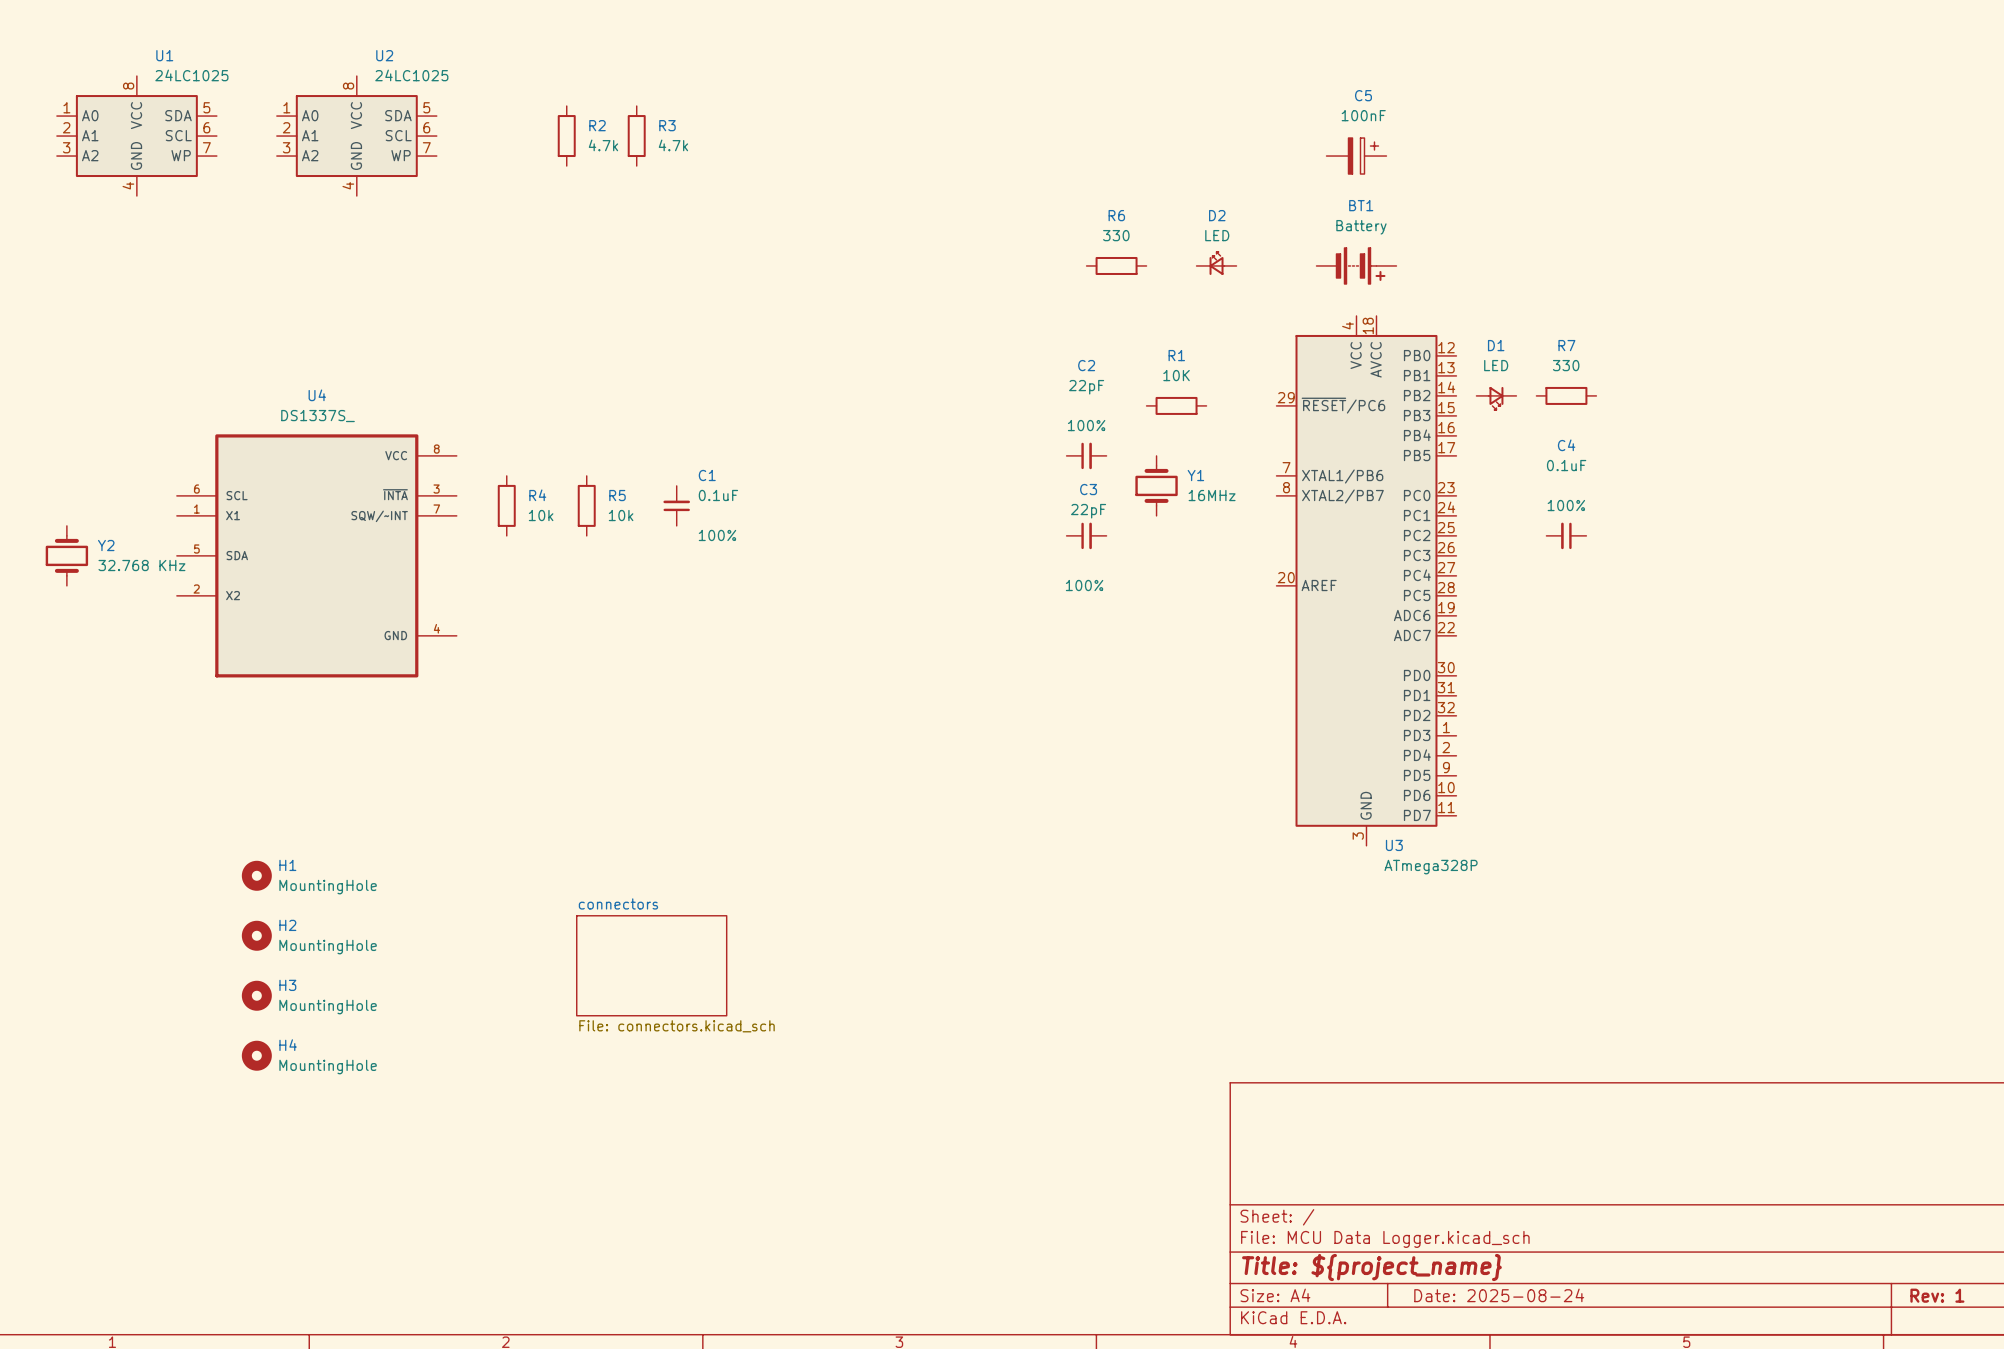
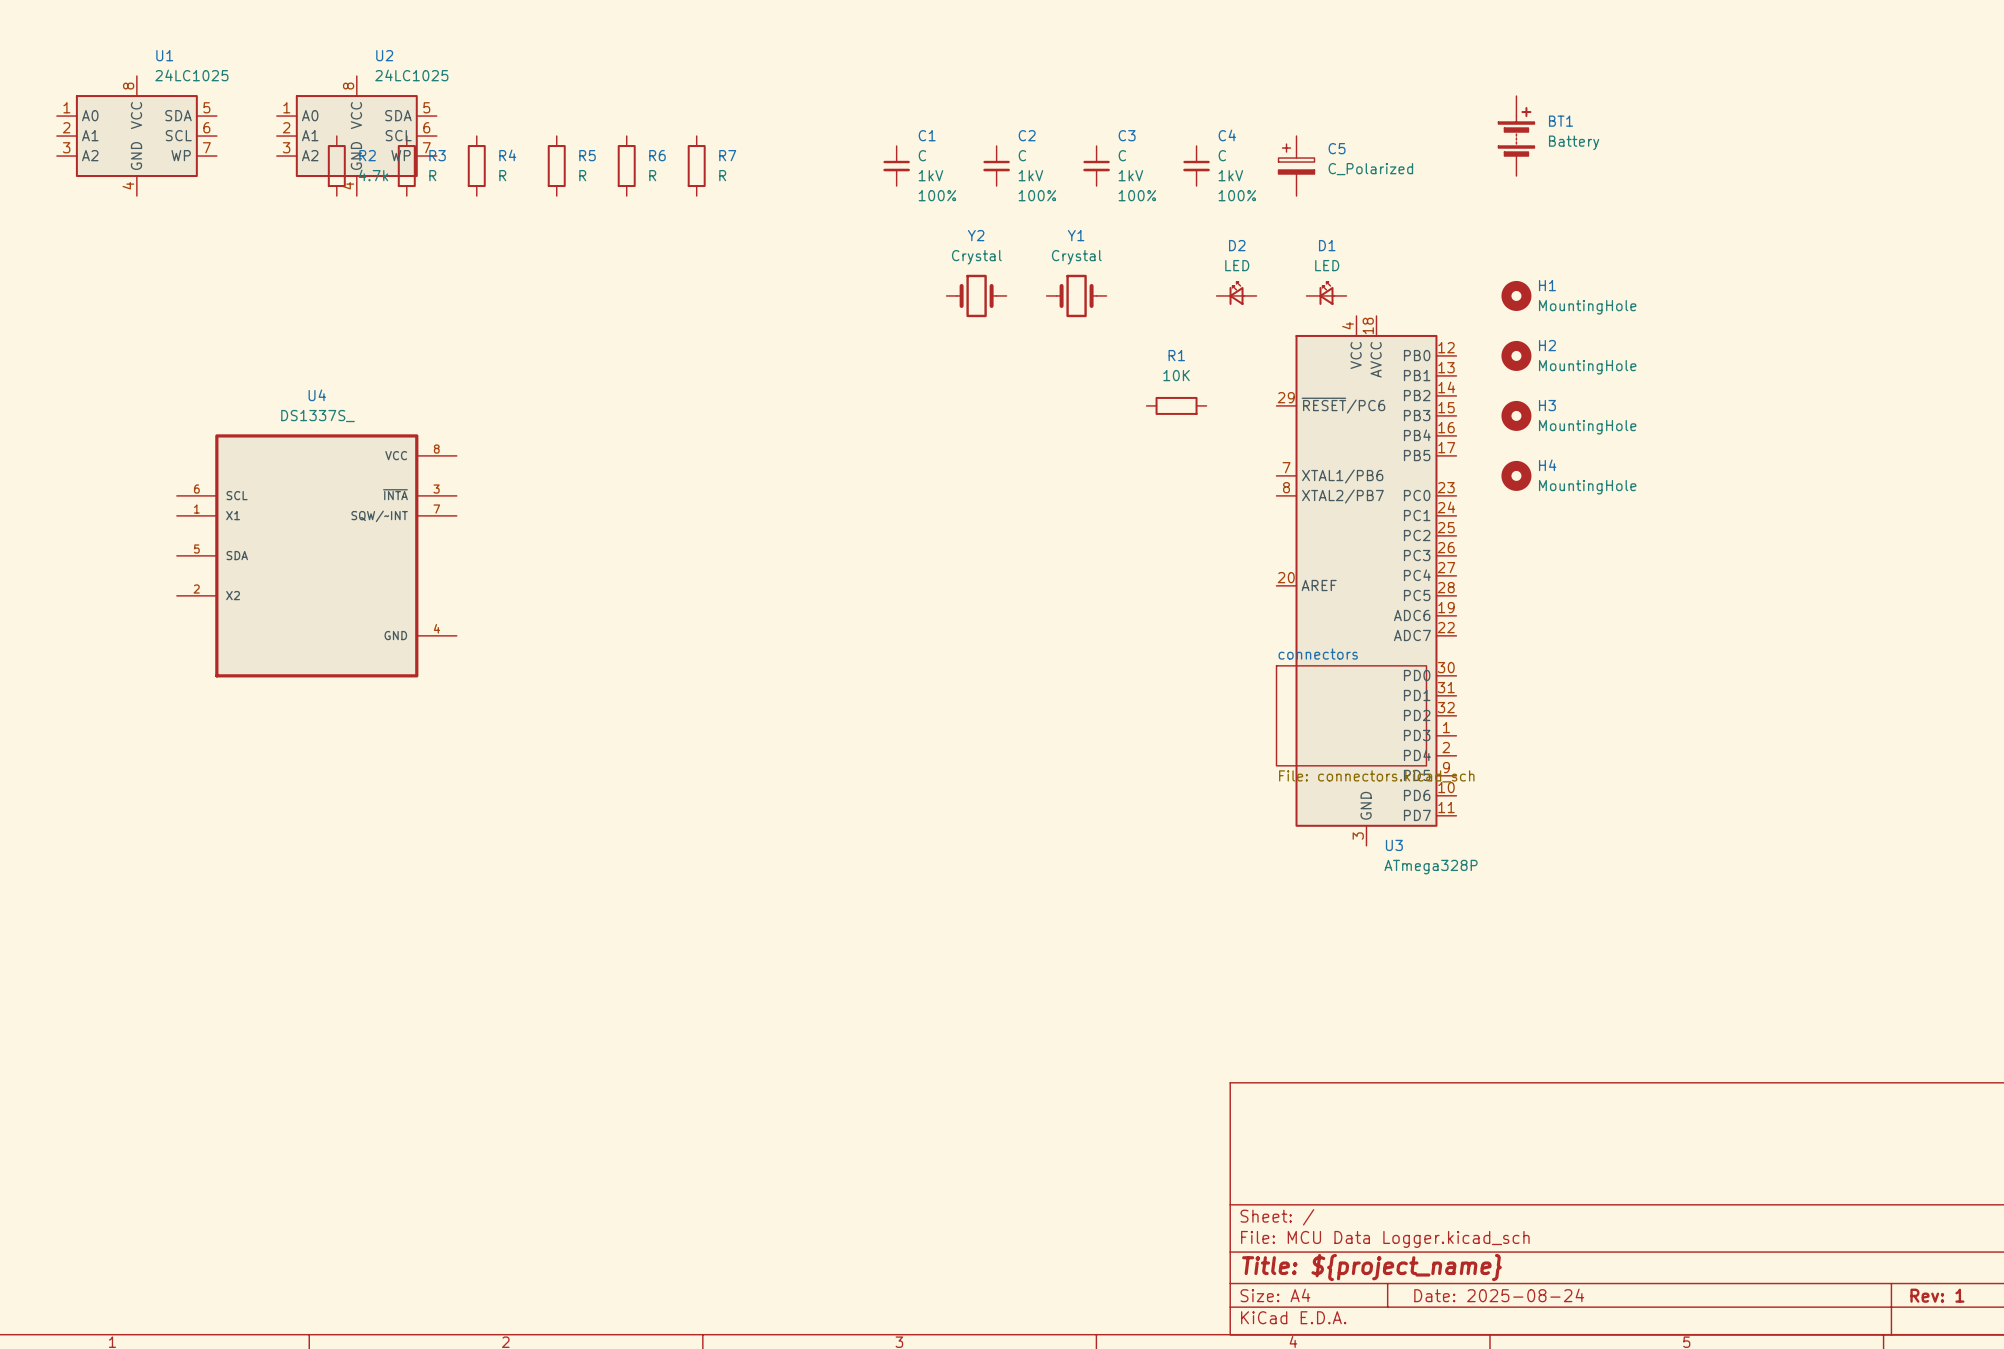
C5 name position: C5 (1363, 95) -> C5 (1337, 148)
C5 value: 100nF (1363, 115) -> C_Polarized (1370, 169)
R2 position: (566, 136) -> (336, 166)
R3 position: (636, 136) -> (406, 166)
R3 value: 4.7k (673, 145) -> R (432, 175)
C5 position: (1356, 156) -> (1296, 166)
C5 rotation: 0° (1363, 156) -> 90° counterclockwise (1296, 159)
C1 text: none -> 1kV (930, 175)
C2 text: none -> 1kV (1030, 175)
C3 text: none -> 1kV (1130, 175)
C4 text: none -> 1kV (1230, 175)
BT1 name position: BT1 (1361, 205) -> BT1 (1561, 121)
R6 name position: R6 (1116, 215) -> R6 (657, 155)
BT1 value position: Battery (1361, 227) -> Battery (1574, 142)
R6 value: 330 (1116, 235) -> R (652, 175)
D2 position: (1216, 263) -> (1236, 293)
R6 rotation: 0° (1116, 265) -> 90° clockwise (626, 166)
R6 position: (1116, 265) -> (626, 166)
BT1 position: (1356, 265) -> (1516, 136)
BT1 rotation: 0° (1360, 265) -> 90° counterclockwise (1516, 131)
R7 name position: R7 (1566, 345) -> R7 (727, 155)
C2 name position: C2 (1086, 365) -> C2 (1027, 135)
R7 value: 330 (1566, 365) -> R (722, 175)
C2 value: 22pF (1086, 387) -> C (1022, 155)
R7 rotation: 0° (1566, 395) -> 90° clockwise (696, 166)
R7 position: (1566, 395) -> (696, 166)
D1 rotation: 0° (1495, 398) -> 180° (1326, 293)
D1 position: (1496, 398) -> (1326, 293)
C2 text position: 100% (1086, 425) -> 100% (1037, 195)
C4 name position: C4 (1566, 445) -> C4 (1227, 135)
C2 rotation: 0° (1086, 455) -> 90° clockwise (996, 166)
C2 position: (1086, 455) -> (996, 166)
C4 value: 0.1uF (1566, 465) -> C (1222, 155)
Y1 name position: Y1 (1195, 475) -> Y1 (1076, 235)
Y1 rotation: 0° (1156, 485) -> 90° clockwise (1076, 295)
Y1 position: (1156, 485) -> (1076, 295)
C3 name position: C3 (1088, 489) -> C3 (1127, 135)
C1 value: 0.1uF (718, 495) -> C (922, 155)
Y1 value: 16MHz (1212, 495) -> Crystal (1076, 257)
R4 position: (506, 505) -> (476, 166)
R5 position: (586, 505) -> (556, 166)
C1 rotation: 0° (676, 505) -> 180° (896, 166)
C1 position: (676, 505) -> (896, 166)
C4 text position: 100% (1566, 505) -> 100% (1237, 195)
C3 value: 22pF (1088, 511) -> C (1122, 155)
R4 value: 10k (541, 515) -> R (502, 175)
R5 value: 10k (621, 515) -> R (582, 175)
C3 rotation: 0° (1086, 535) -> 90° clockwise (1096, 166)
C3 position: (1086, 535) -> (1096, 166)
C4 rotation: 0° (1566, 535) -> 90° counterclockwise (1196, 166)
C4 position: (1566, 535) -> (1196, 166)
Y2 name position: Y2 (106, 545) -> Y2 (976, 235)
Y2 rotation: 0° (66, 555) -> 90° clockwise (976, 295)
Y2 position: (66, 555) -> (976, 295)
Y2 value: 32.768 KHz (141, 565) -> Crystal (976, 257)
C3 text position: 100% (1084, 585) -> 100% (1137, 195)
sheet connectors: none -> File: connectors.kicad_sch (1351, 715)
H1 position: (256, 875) -> (1516, 295)
H2 position: (256, 935) -> (1516, 355)
sheet connectors: File: connectors.kicad_sch (651, 965) -> none
H3 position: (256, 995) -> (1516, 415)
H4 position: (256, 1055) -> (1516, 475)

